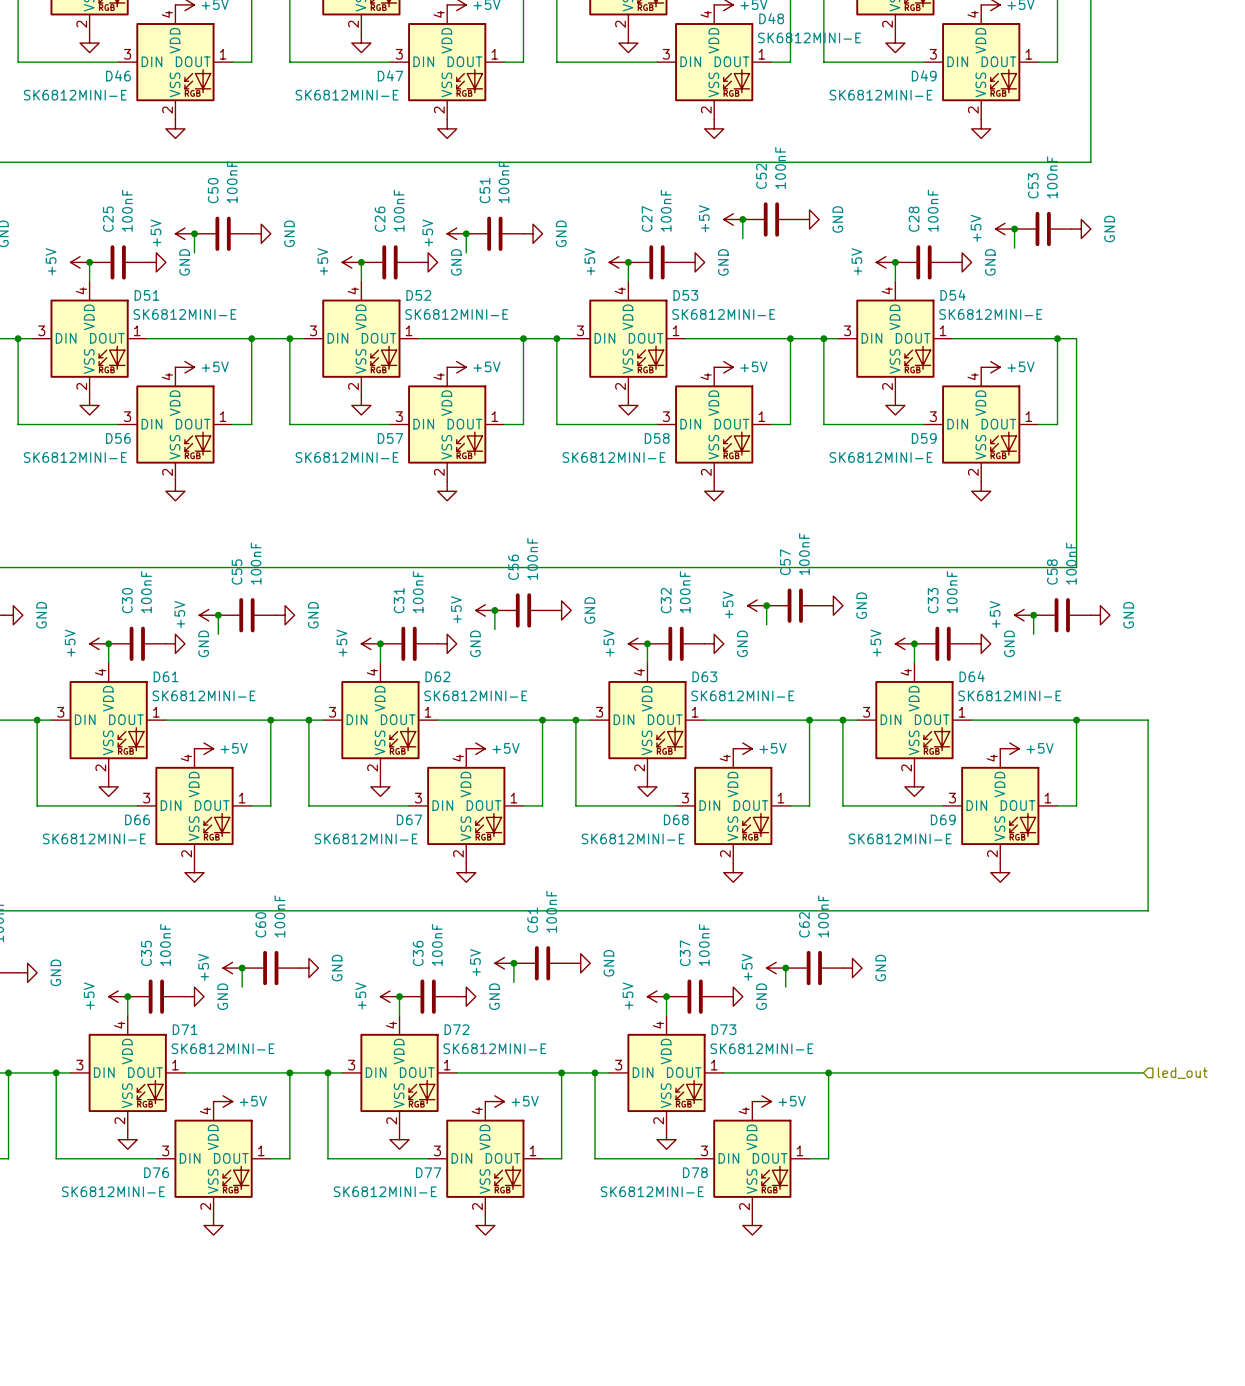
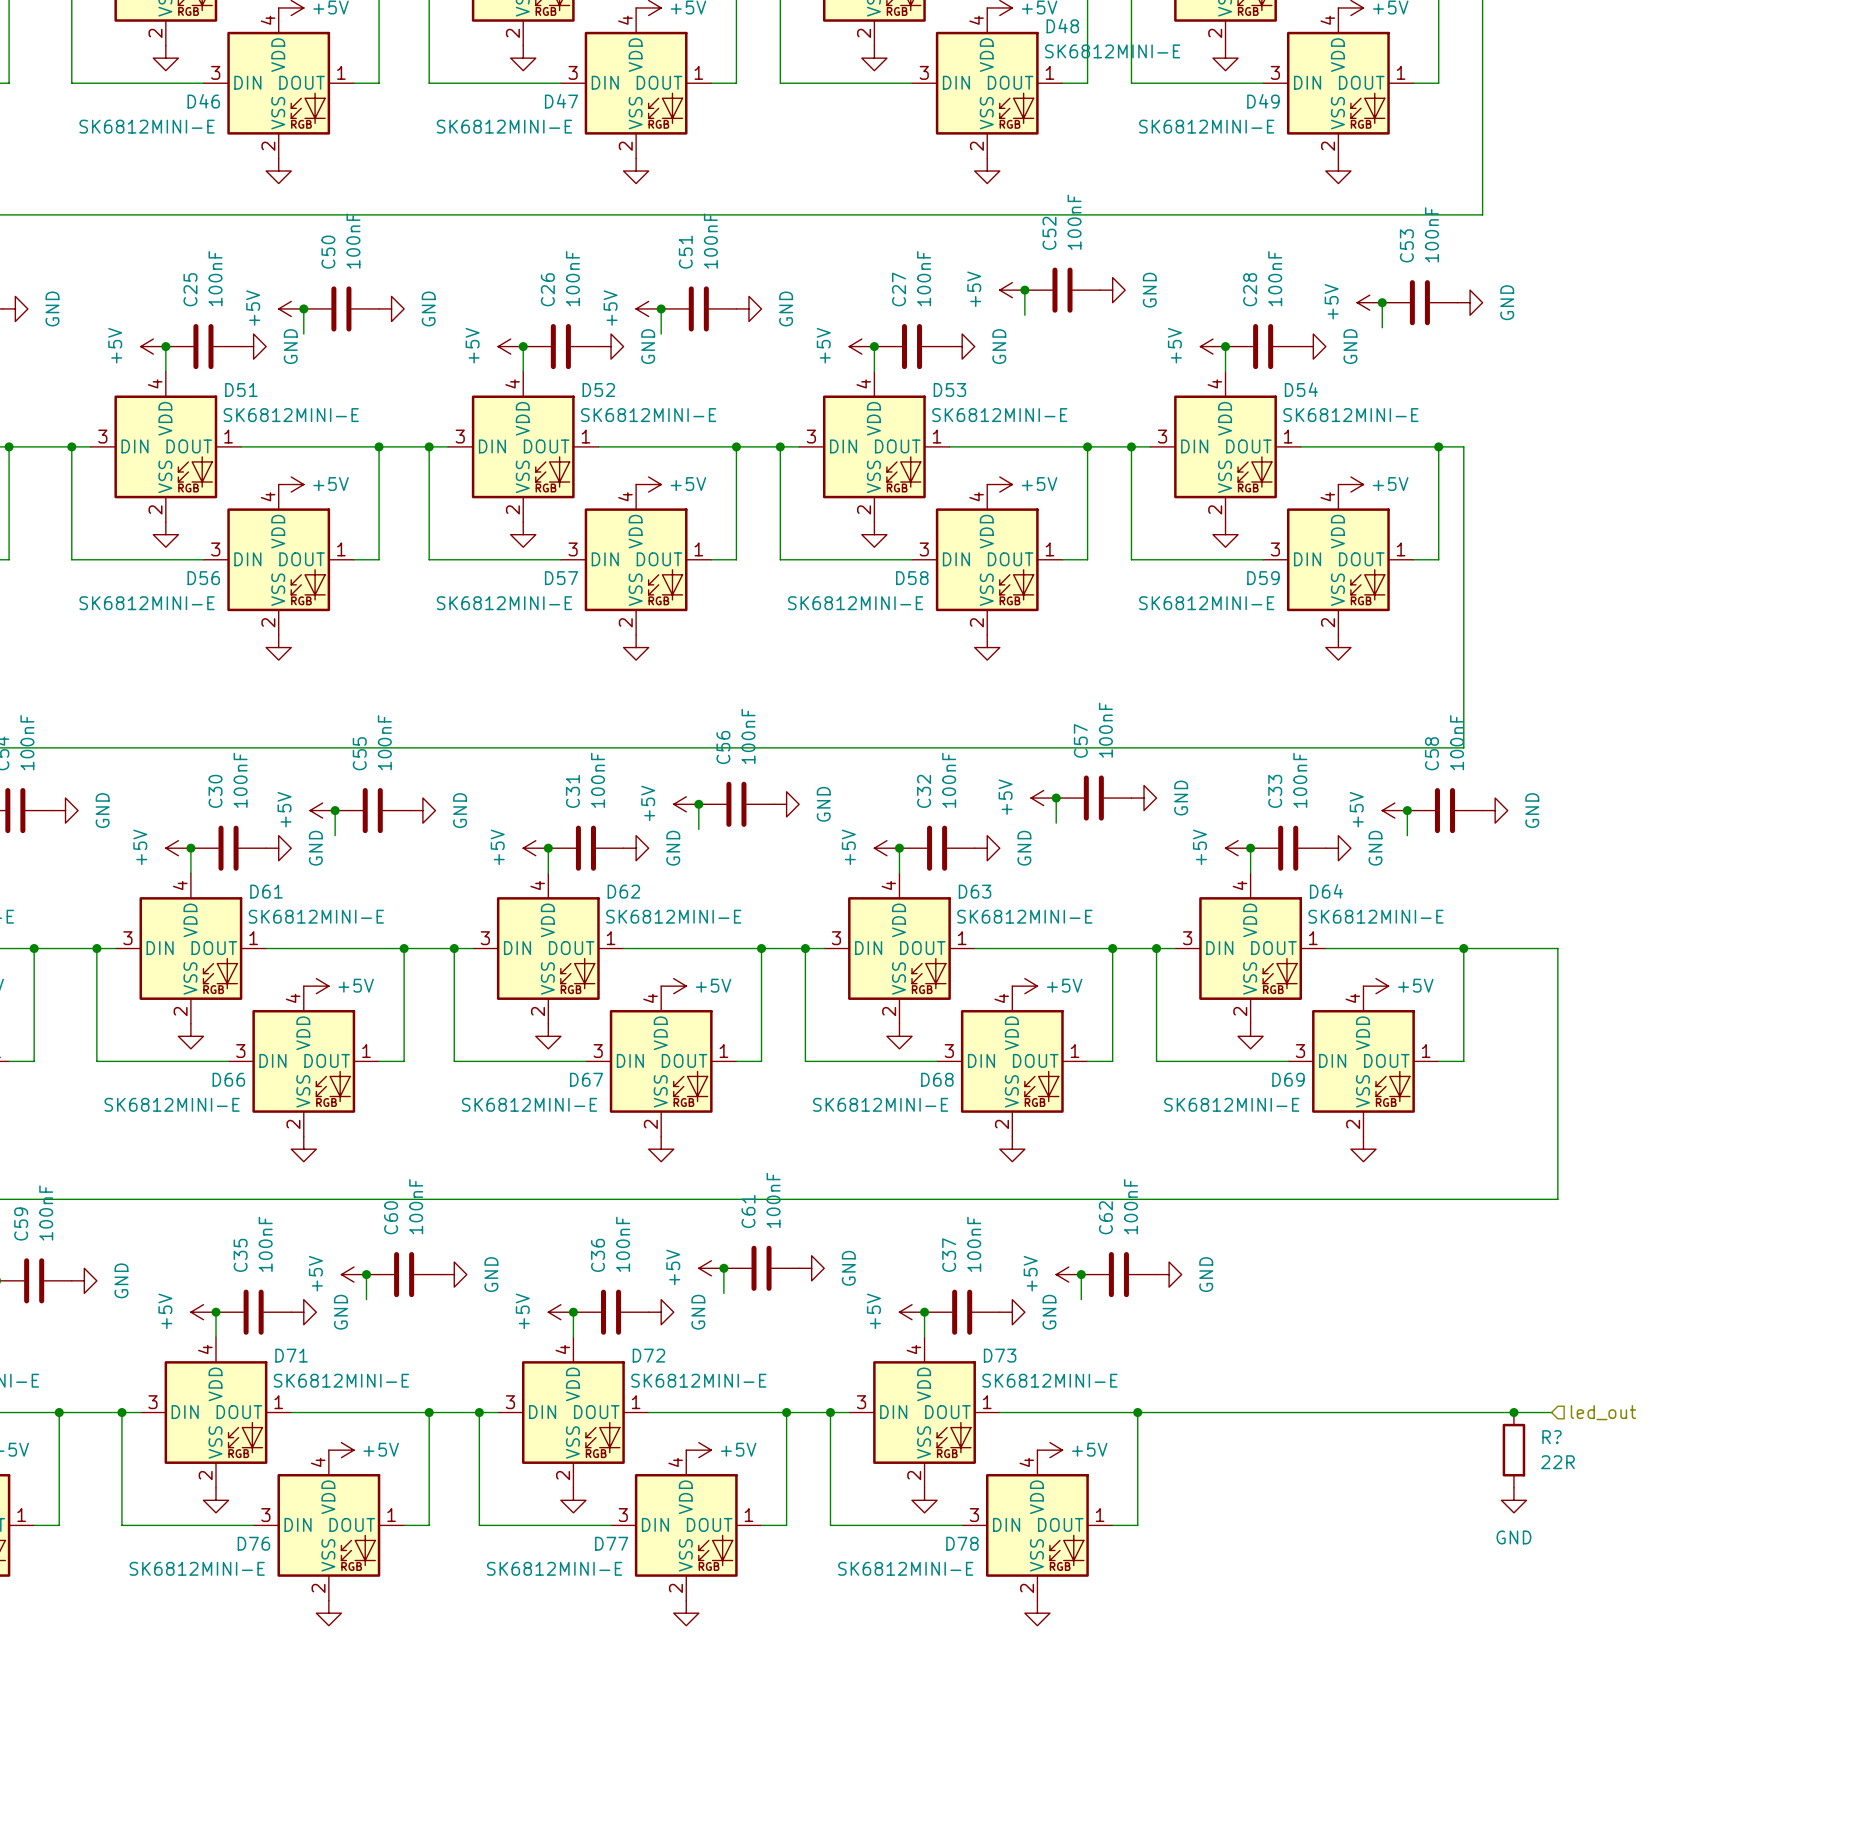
junction: none -> (1513, 1412)
R?: none -> 22R (1513, 1450)
power symbol: none -> GND (1513, 1500)

